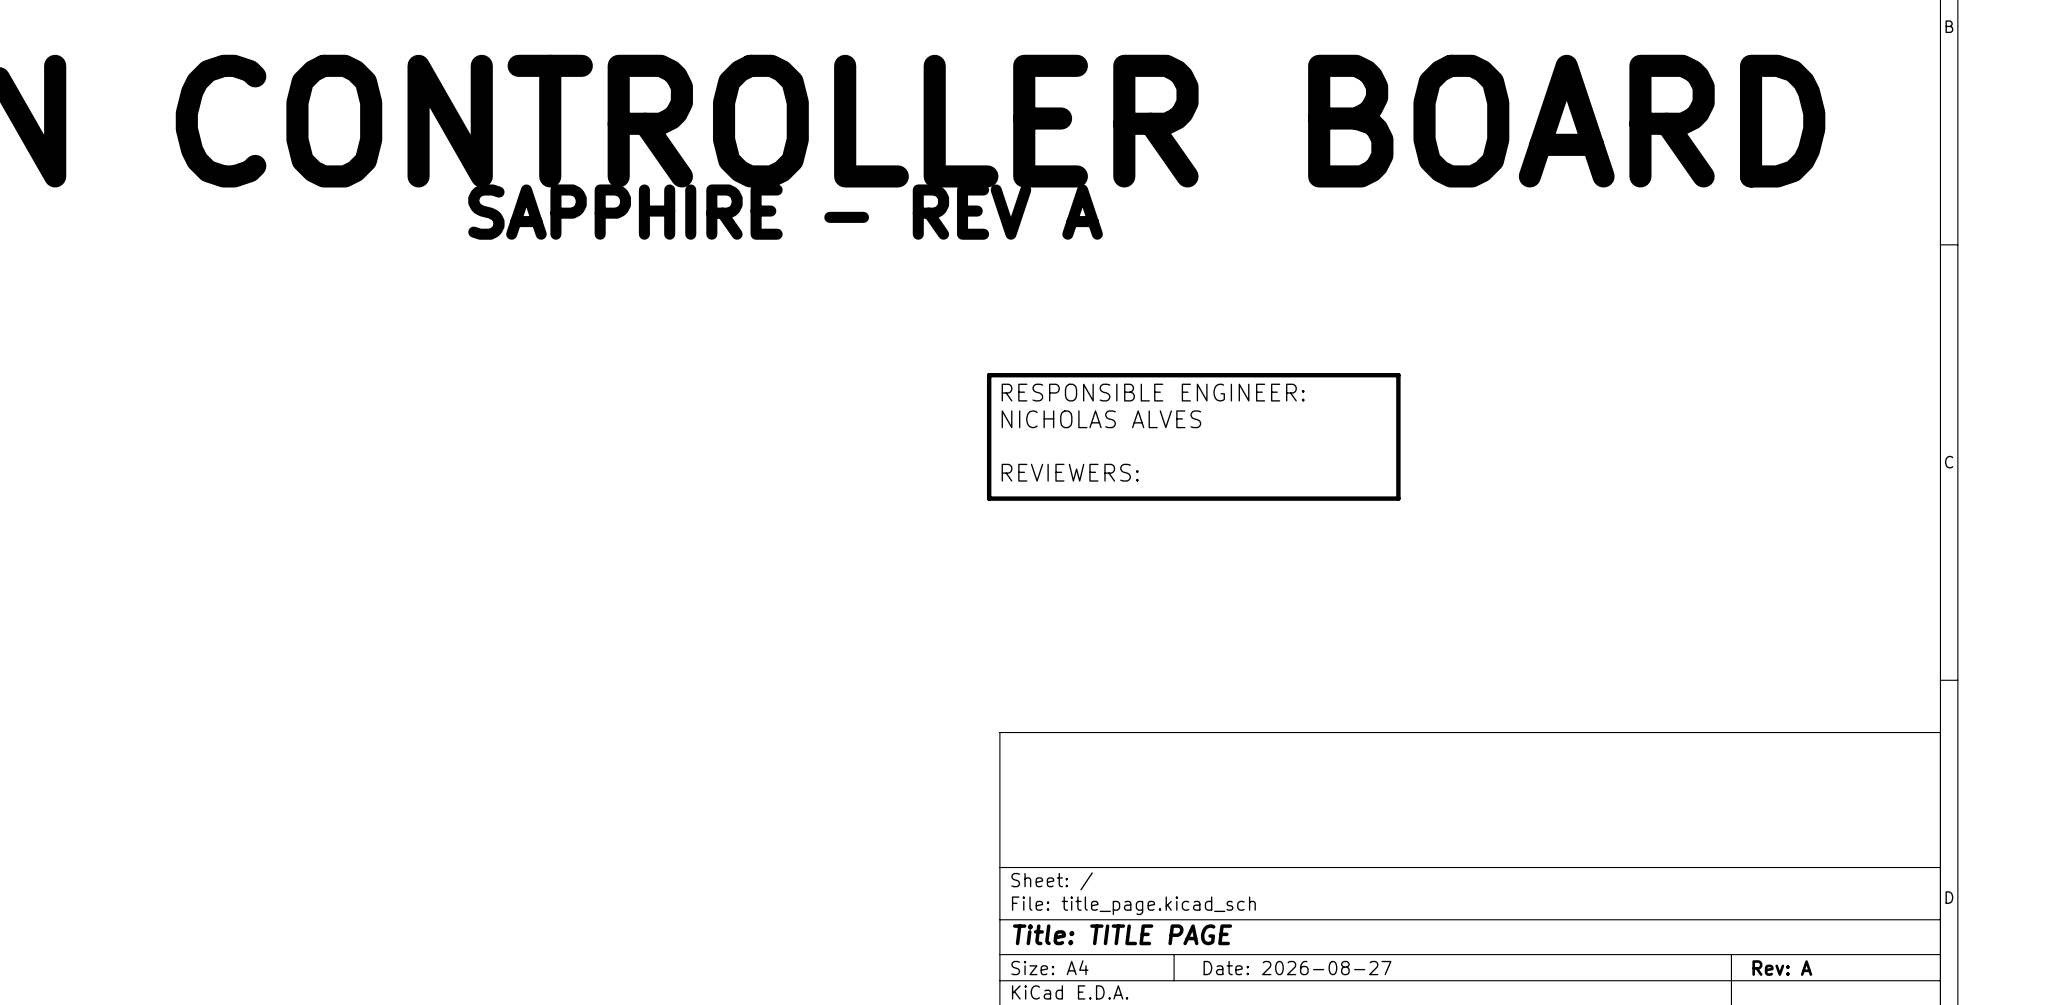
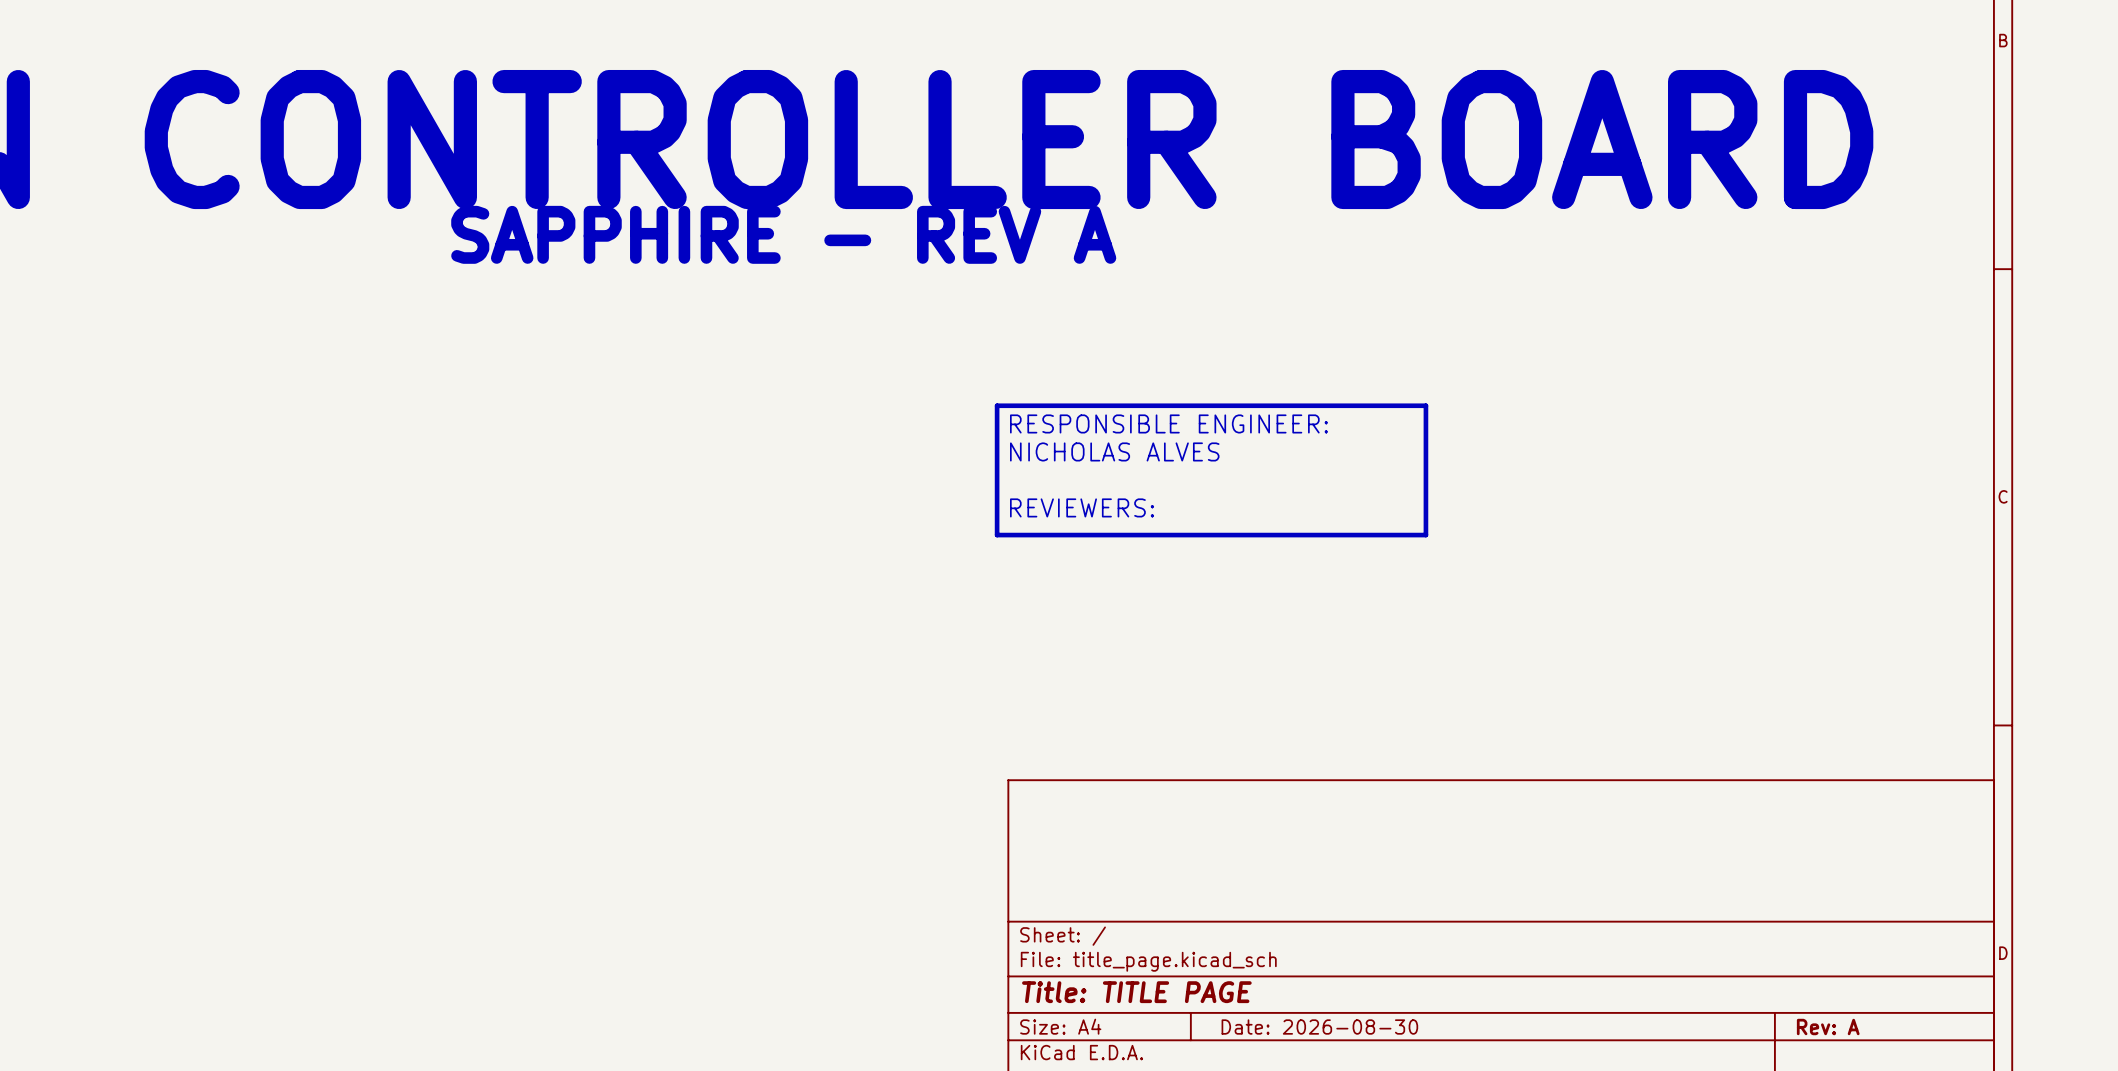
title block: Date: 2026-08-27 (1297, 968) -> Date: 2026-08-30 (1319, 1027)

